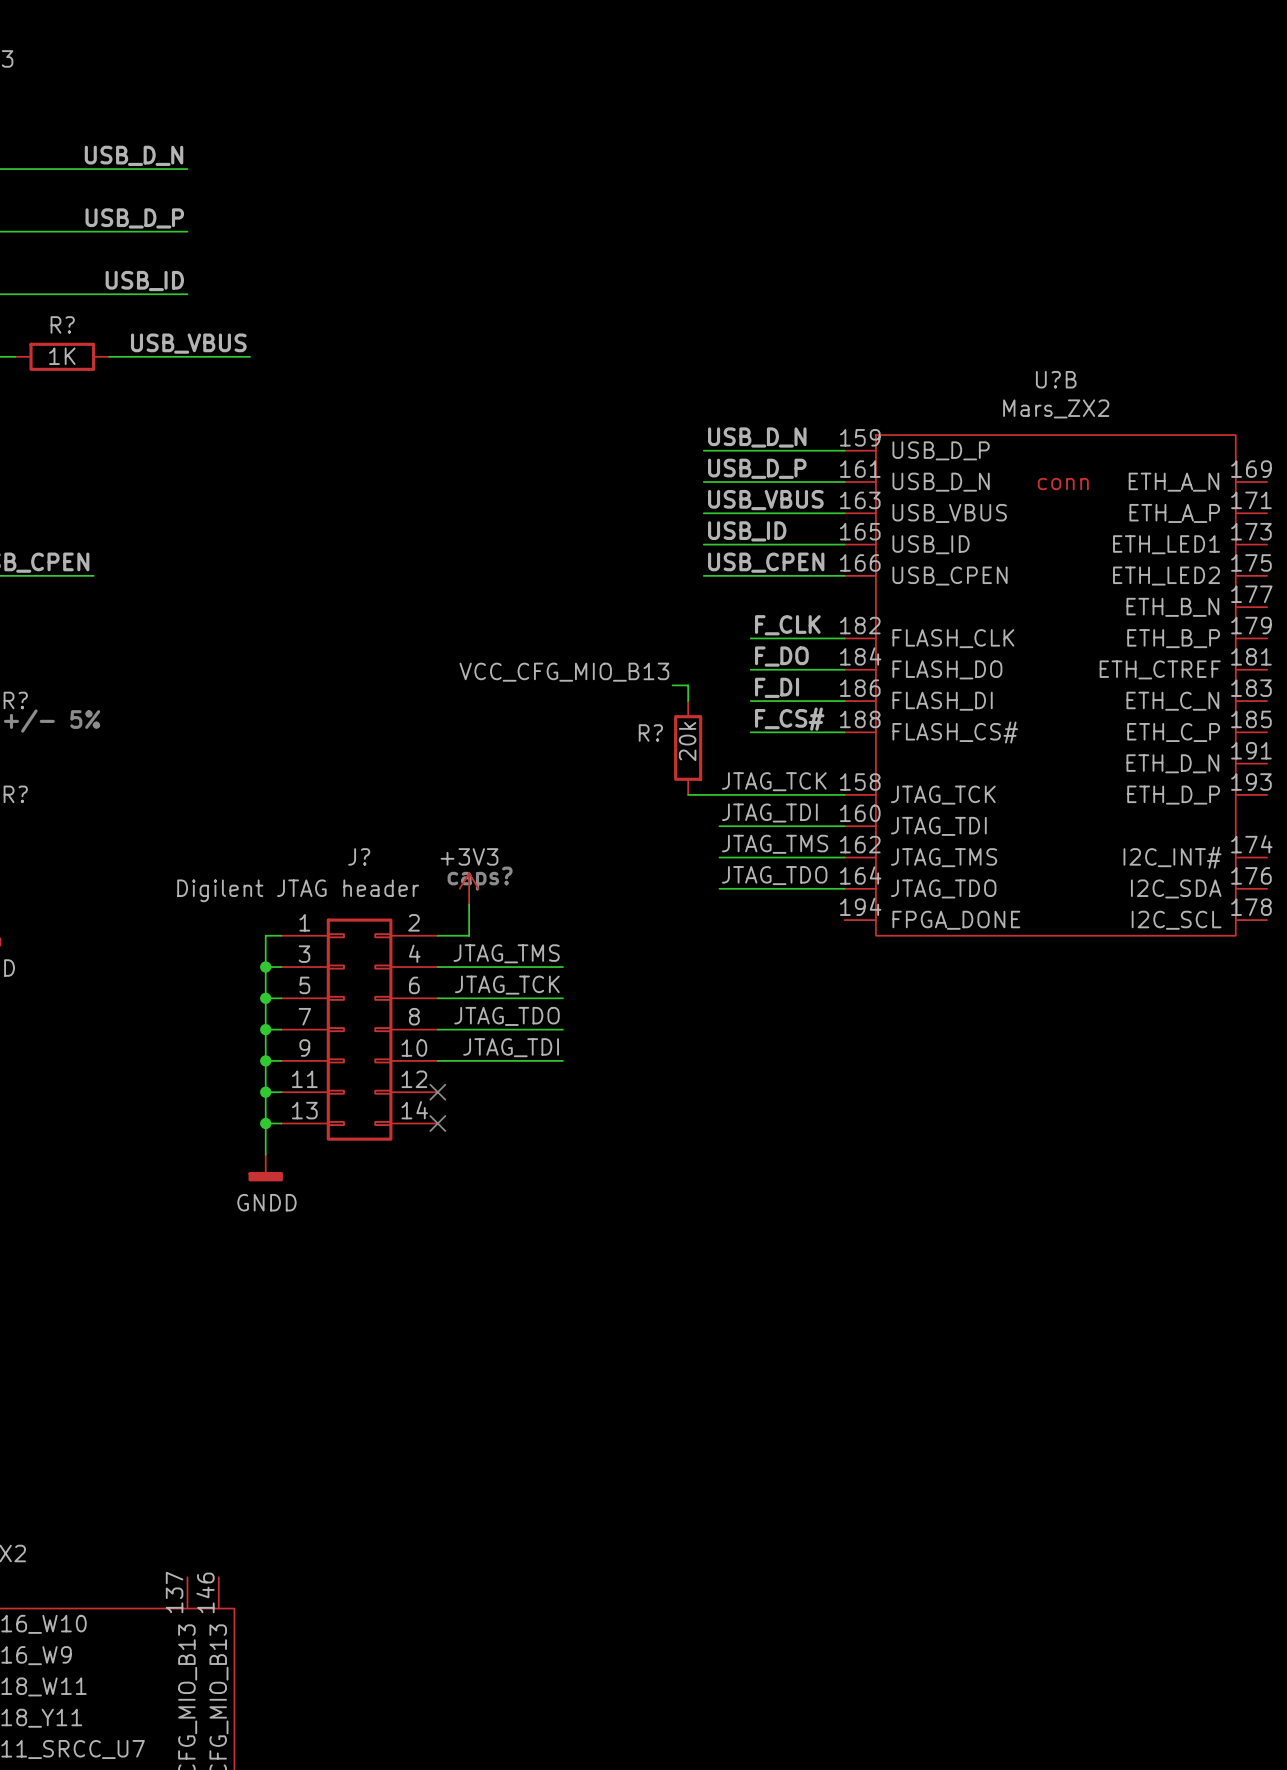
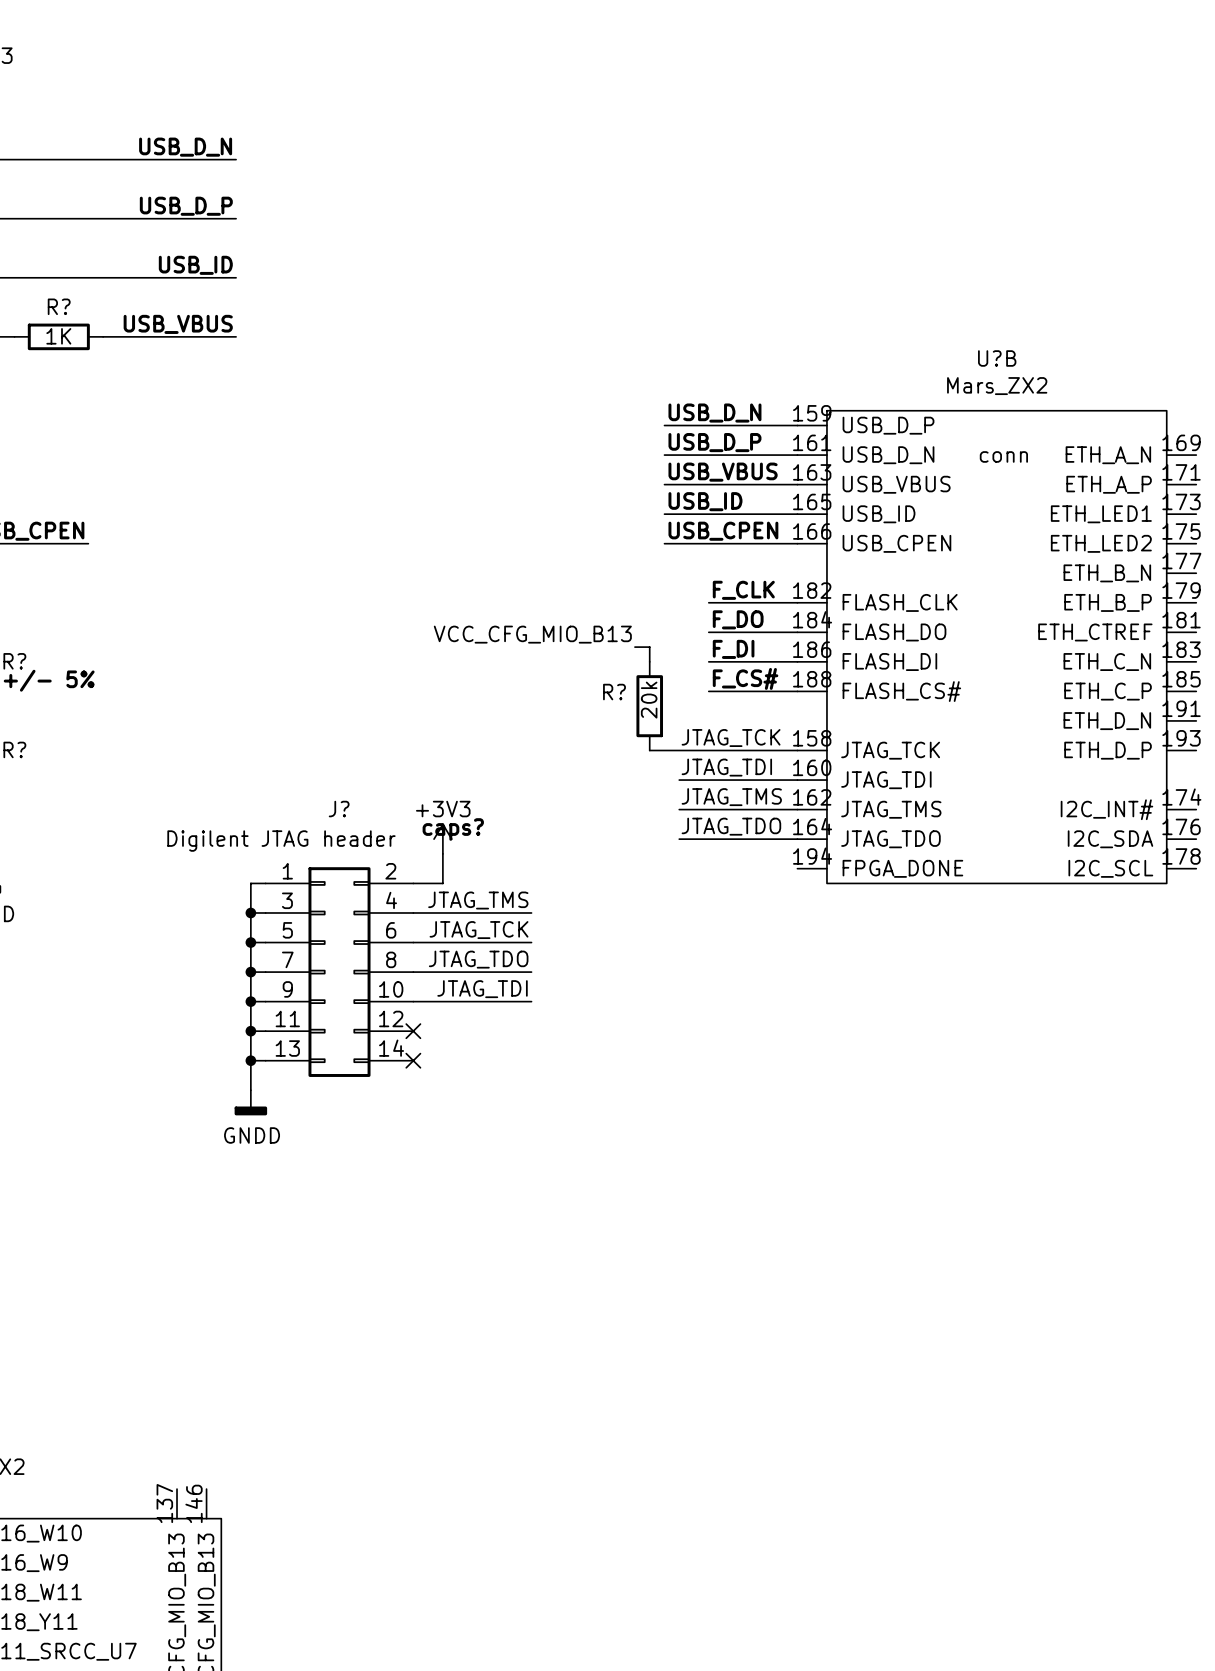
label position: USB_D_N (134, 155) -> USB_D_N (185, 147)
wire: none -> (177, 159) (236, 159)
label position: USB_D_P (134, 218) -> USB_D_P (186, 206)
wire: none -> (177, 218) (236, 218)
label position: USB_ID (144, 281) -> USB_ID (195, 265)
wire: none -> (177, 277) (236, 277)

